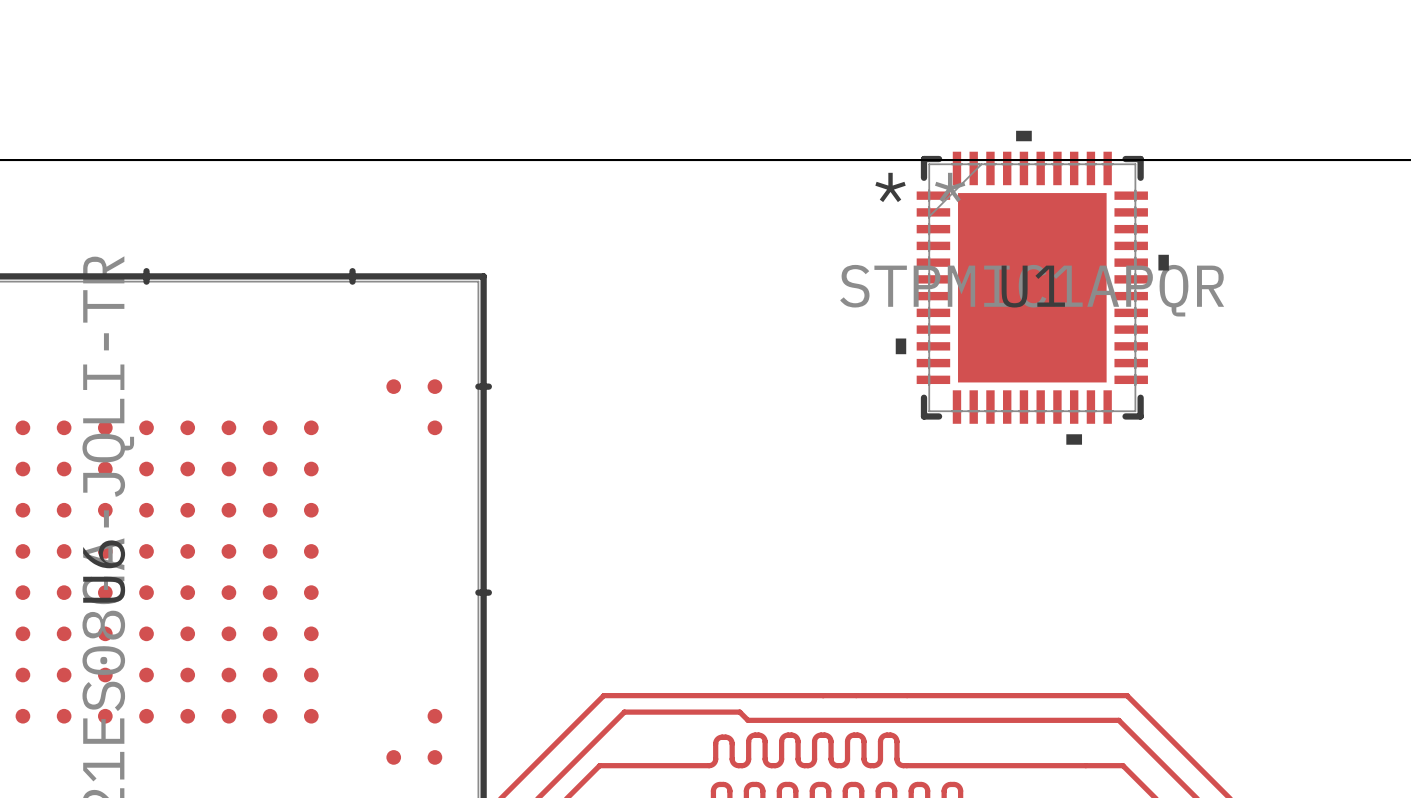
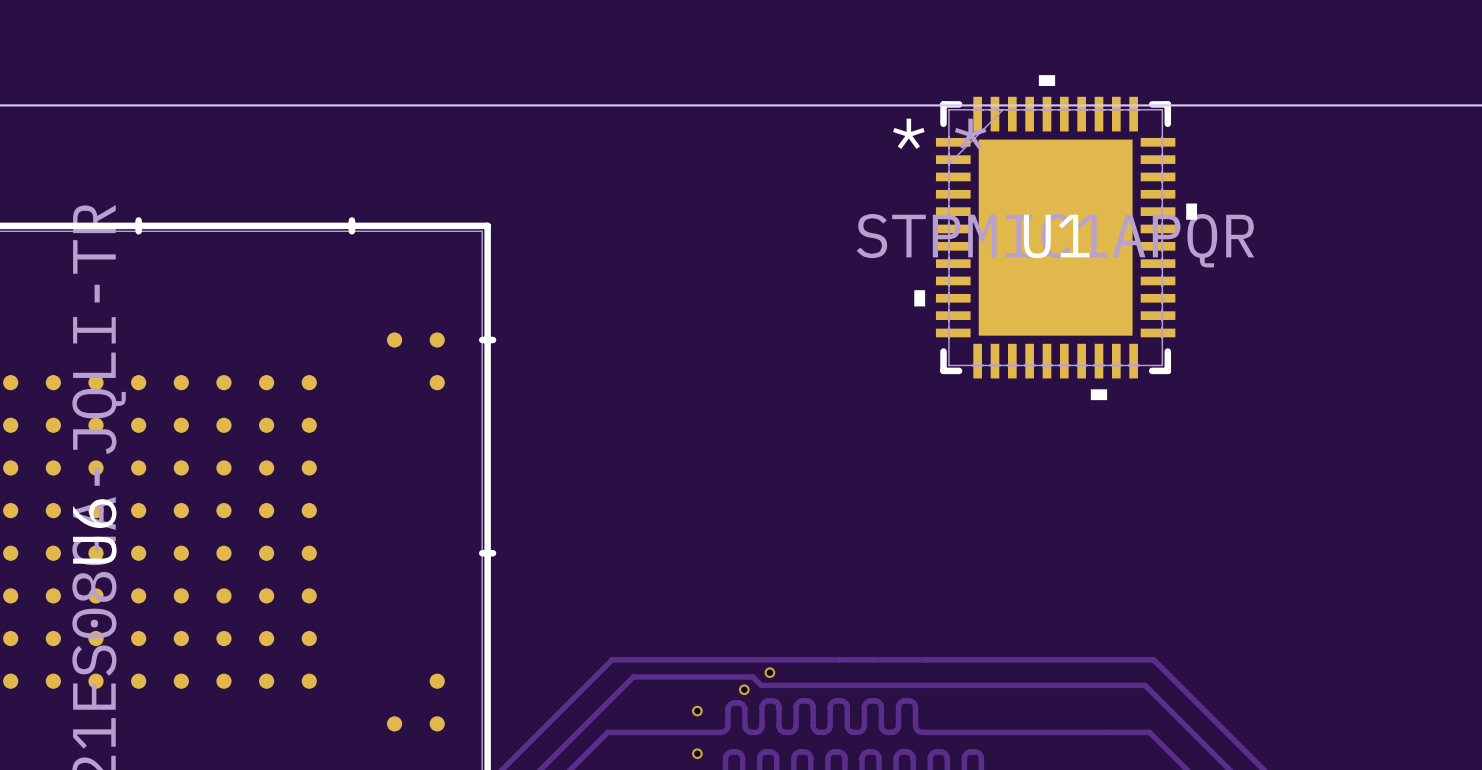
via: none -> (769, 672)
via: none -> (744, 689)
via: none -> (697, 711)
via: none -> (697, 753)

